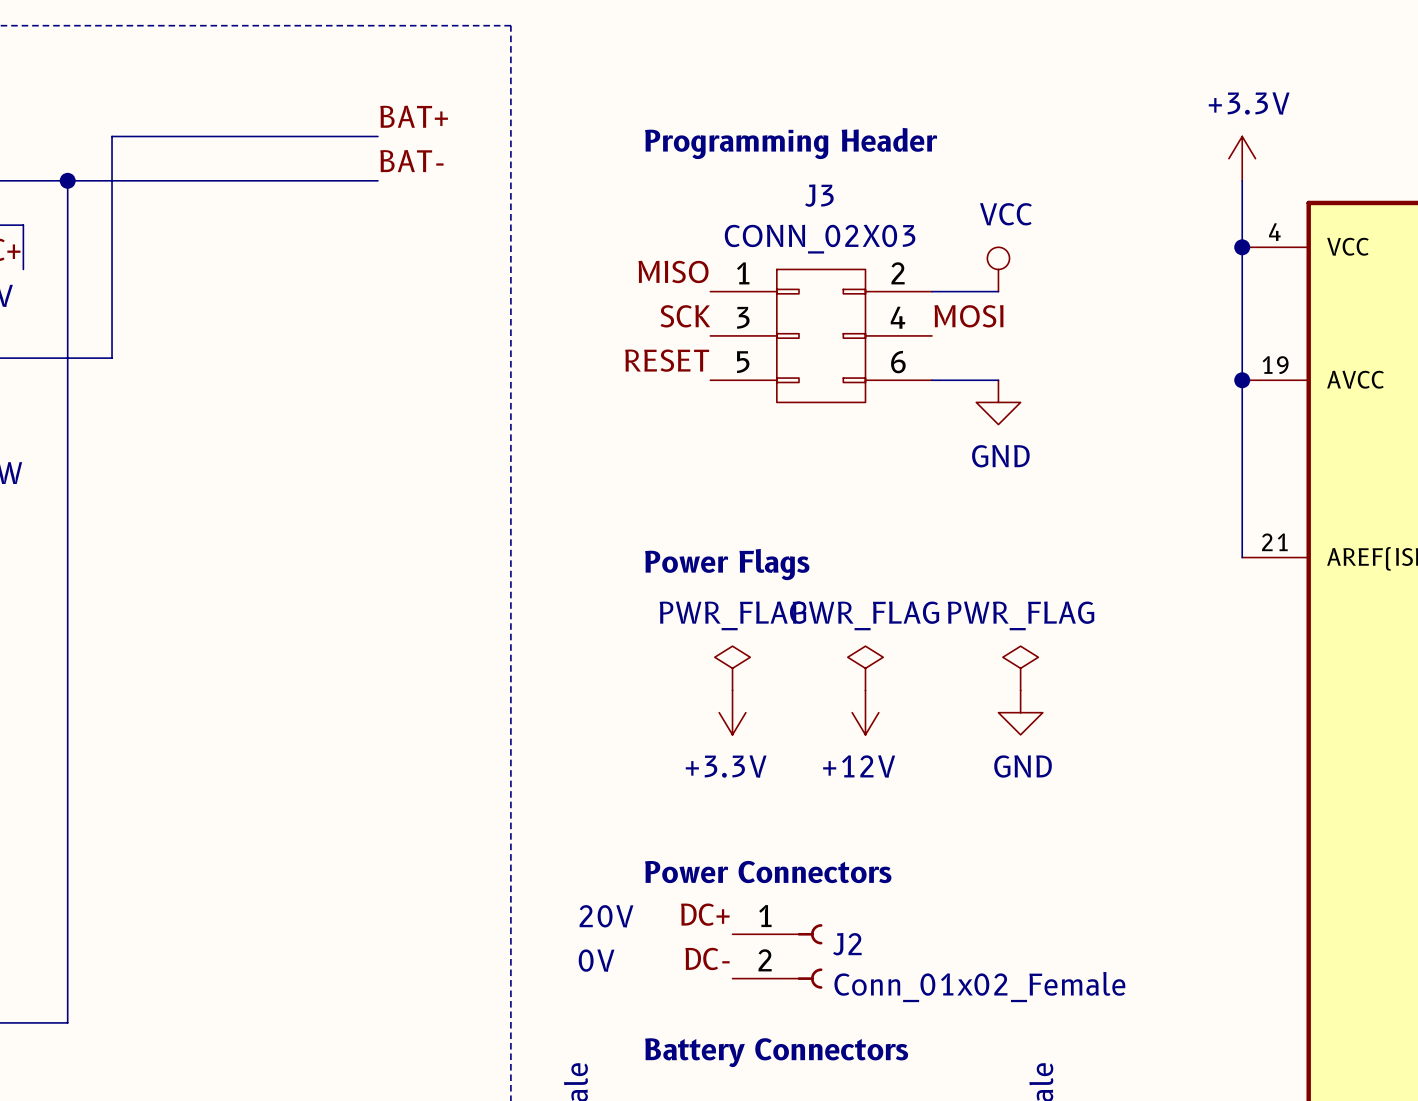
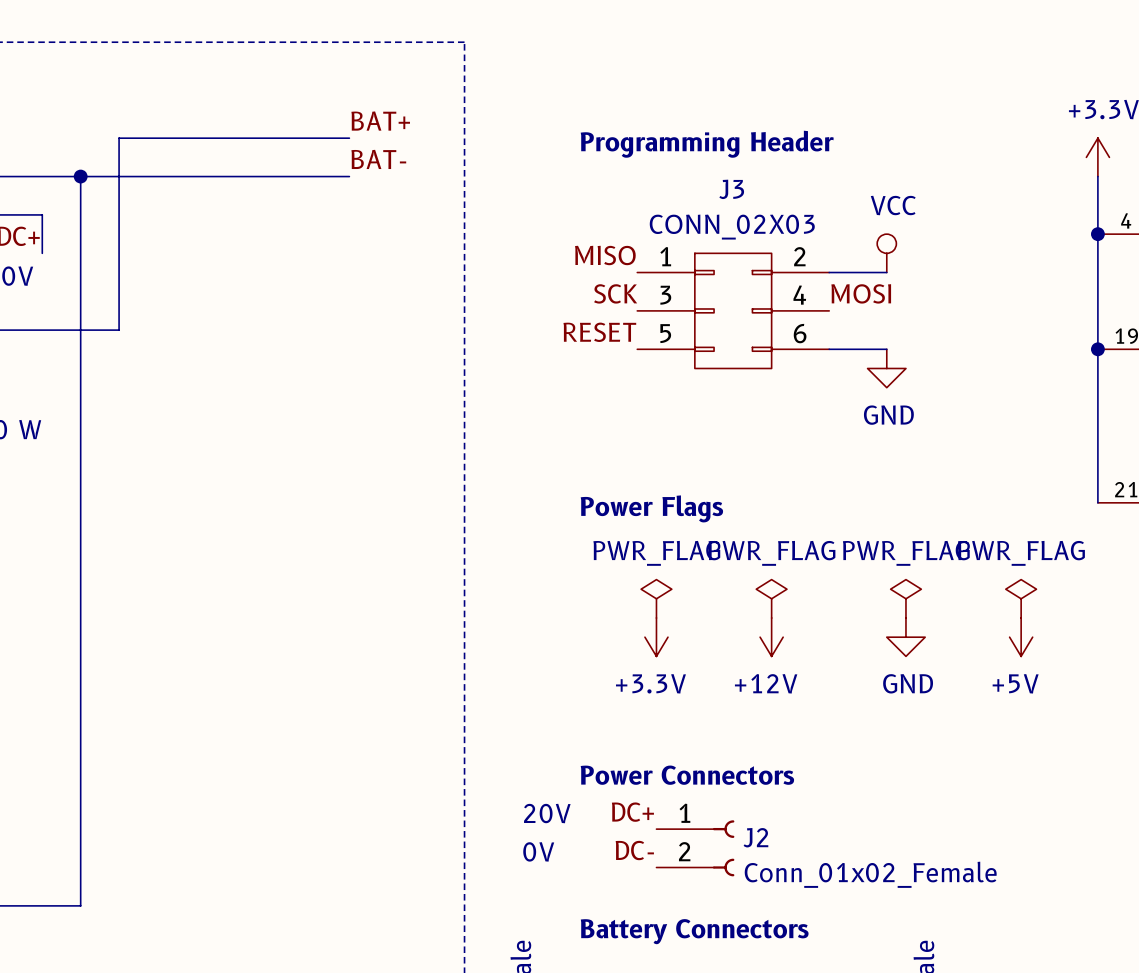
power symbol: none -> PWR_FLAG (1021, 598)
power symbol: none -> +5V (1021, 637)

